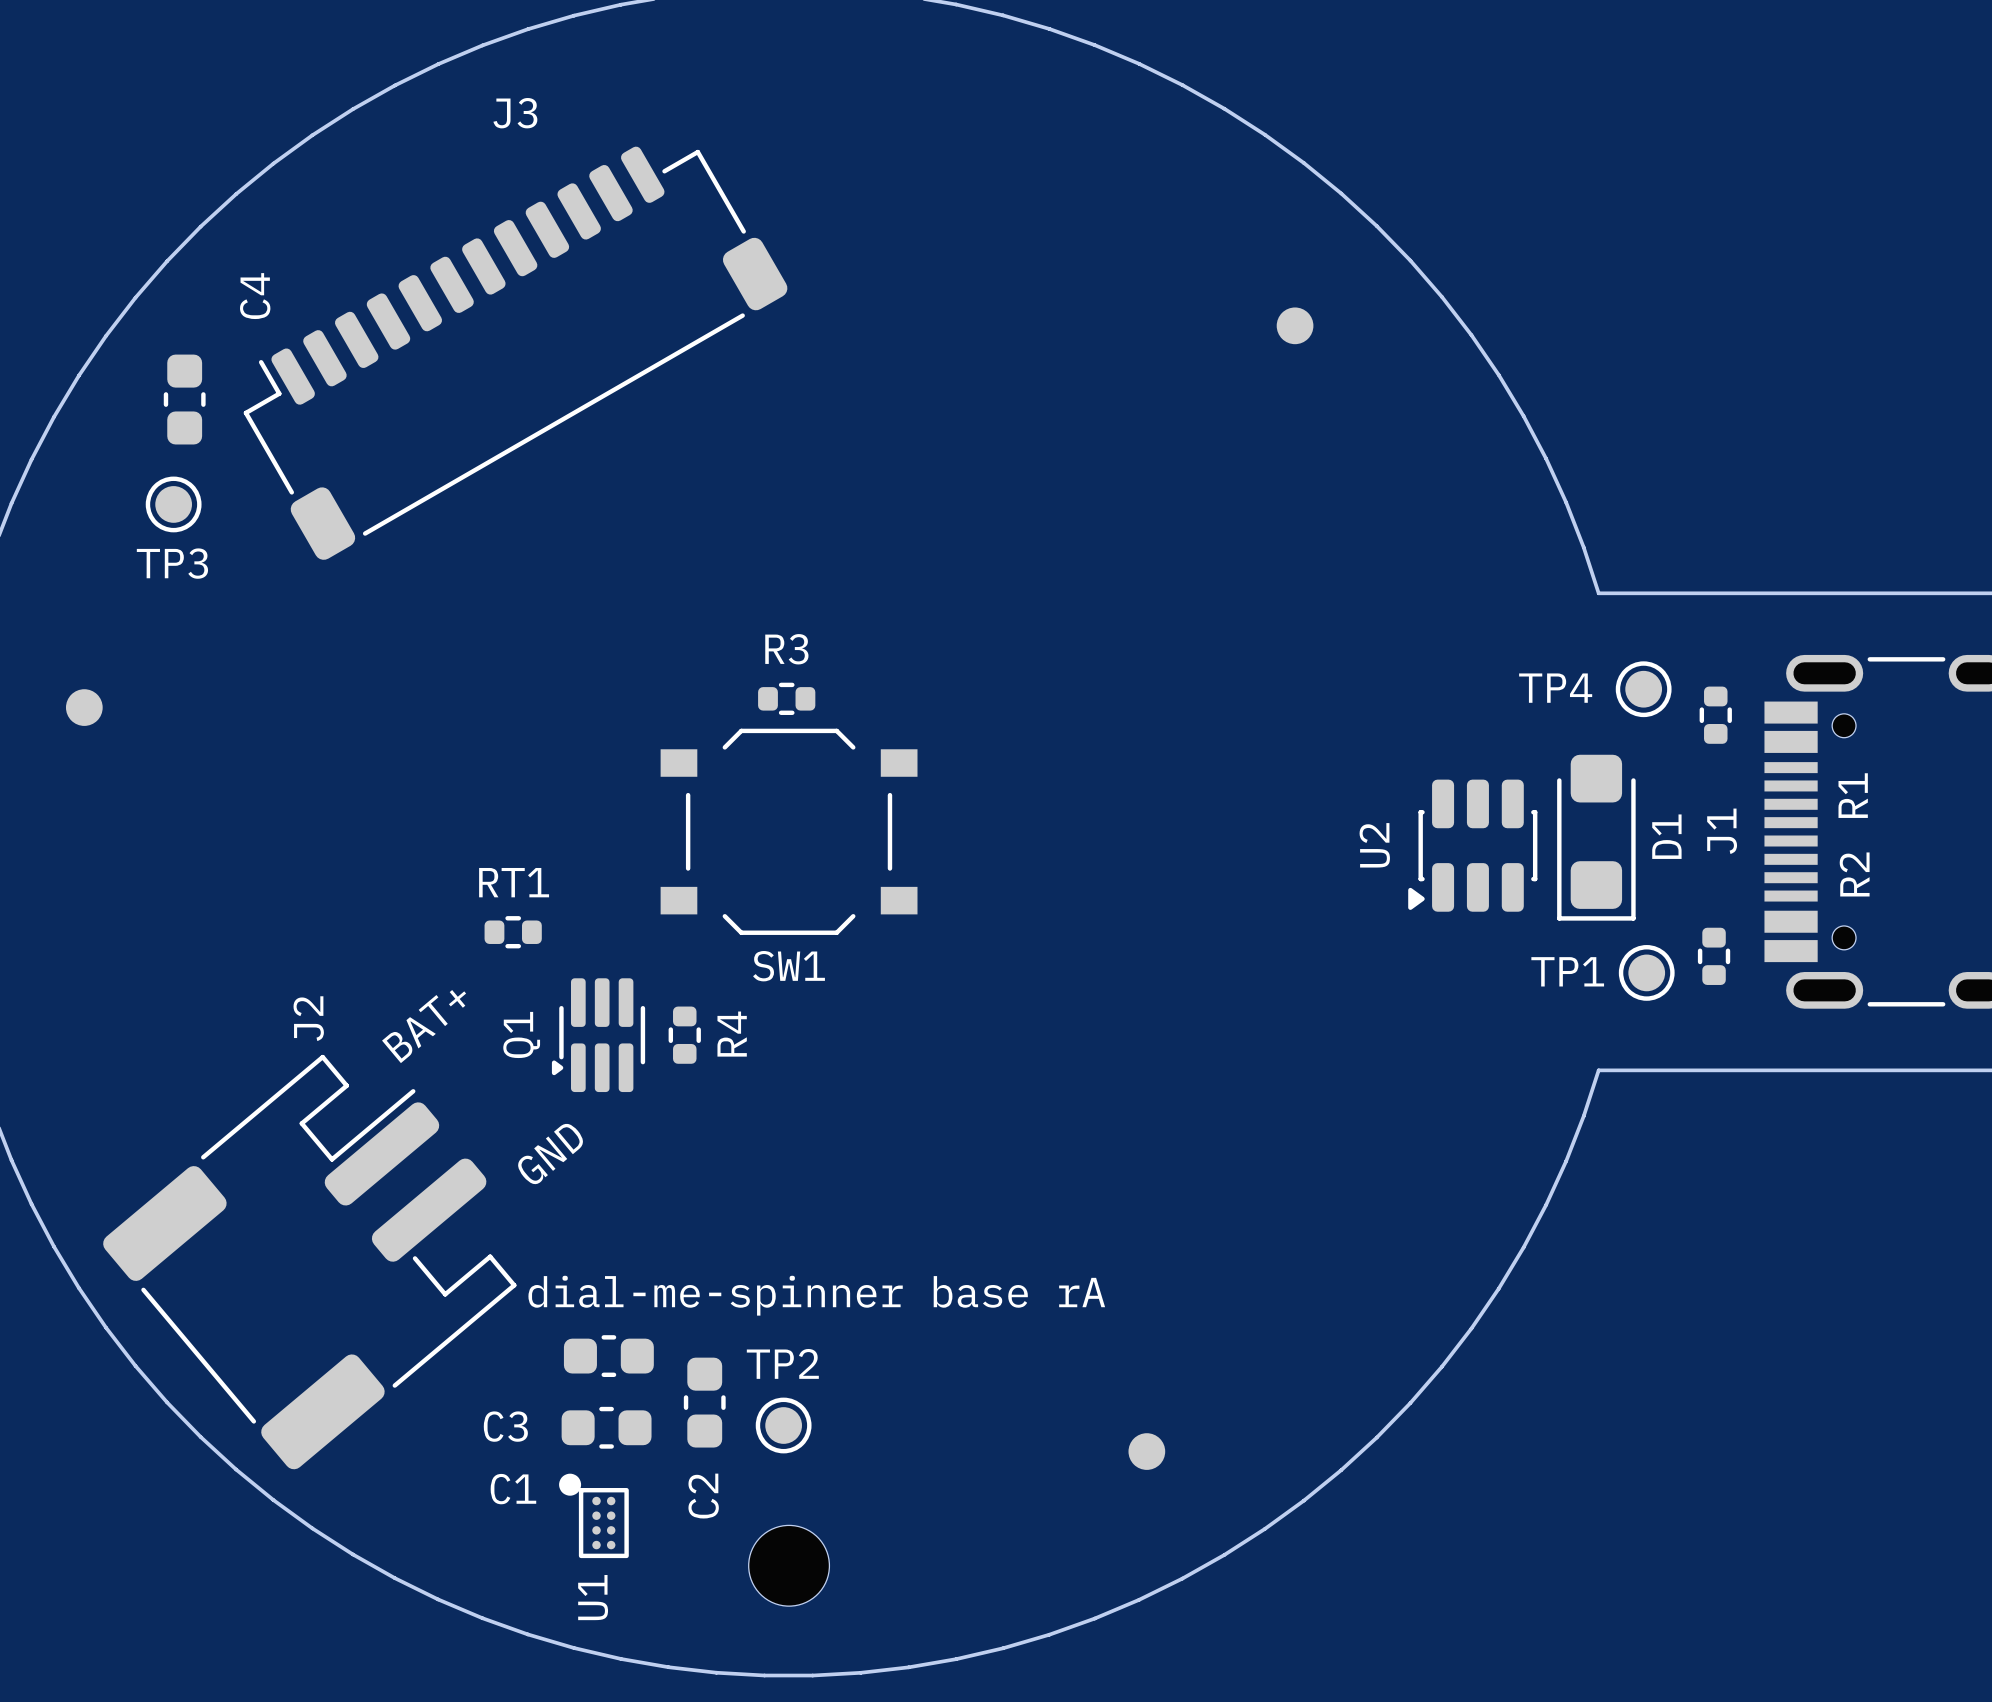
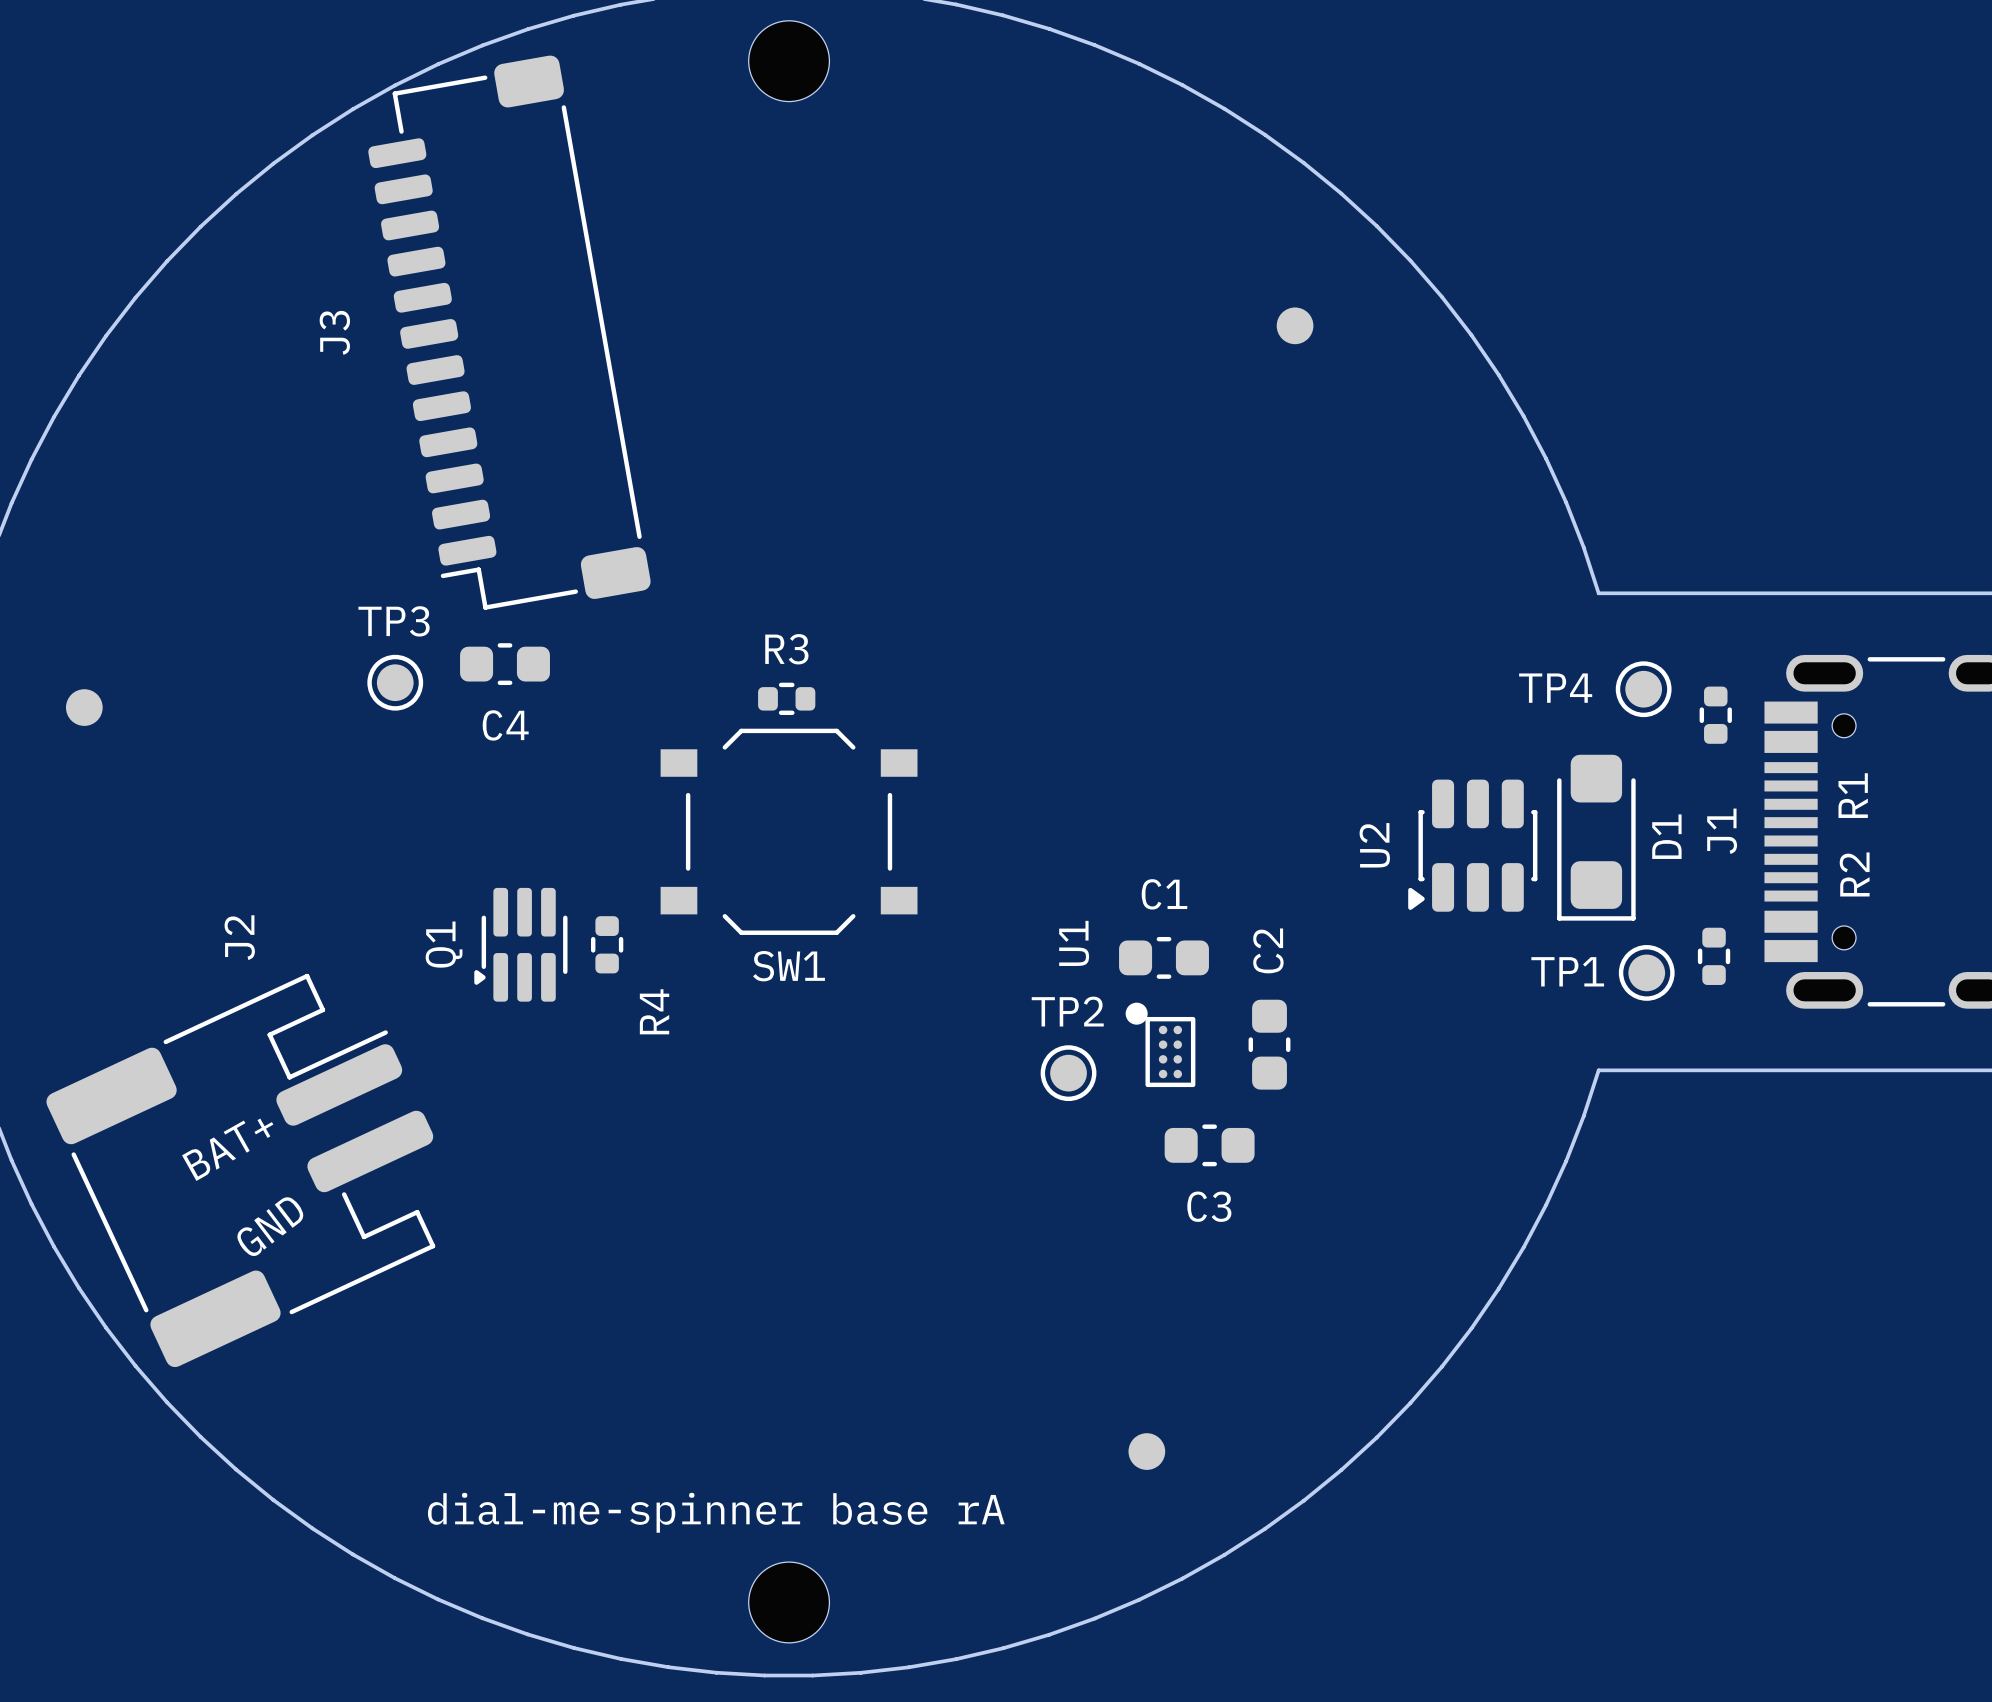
part: none -> (789, 61)
J3 name position: J3 (515, 113) -> J3 (334, 332)
C4 name position: C4 (255, 296) -> C4 (505, 725)
J3 rotation: 0° (515, 353) -> 70° counterclockwise (509, 332)
C4 rotation: 0° (184, 399) -> 90° clockwise (505, 664)
C4 position: (184, 399) -> (505, 664)
TP3 position: (173, 504) -> (395, 682)
TP3 name position: TP3 (172, 563) -> TP3 (394, 621)
RT1: (513, 932) -> none
text rotation: 0° (424, 1026) -> 10.6° clockwise (227, 1149)
text position: BAT+ (424, 1026) -> BAT+ (227, 1149)
R4 name position: R4 (732, 1034) -> R4 (654, 1011)
Q1 position: (598, 1035) -> (520, 944)
R4 position: (684, 1035) -> (607, 944)
text rotation: 0° (550, 1154) -> 2.6° clockwise (270, 1226)
text position: GND (550, 1154) -> GND (270, 1226)
J2 rotation: 0° (309, 1262) -> 15° clockwise (240, 1170)
text position: dial-me-spinner base rA (816, 1295) -> dial-me-spinner base rA (716, 1512)
C3 position: (608, 1356) -> (1209, 1145)
C2 position: (704, 1402) -> (1269, 1044)
TP2 position: (783, 1425) -> (1068, 1073)
C3 name position: C3 (505, 1426) -> C3 (1209, 1206)
C1 position: (606, 1427) -> (1164, 957)
C1 name position: C1 (513, 1489) -> C1 (1164, 894)
C2 name position: C2 (703, 1496) -> C2 (1268, 950)
U1 position: (593, 1515) -> (1160, 1044)
part position: (789, 1565) -> (789, 1602)
U1 name position: U1 (593, 1597) -> U1 (1074, 943)

